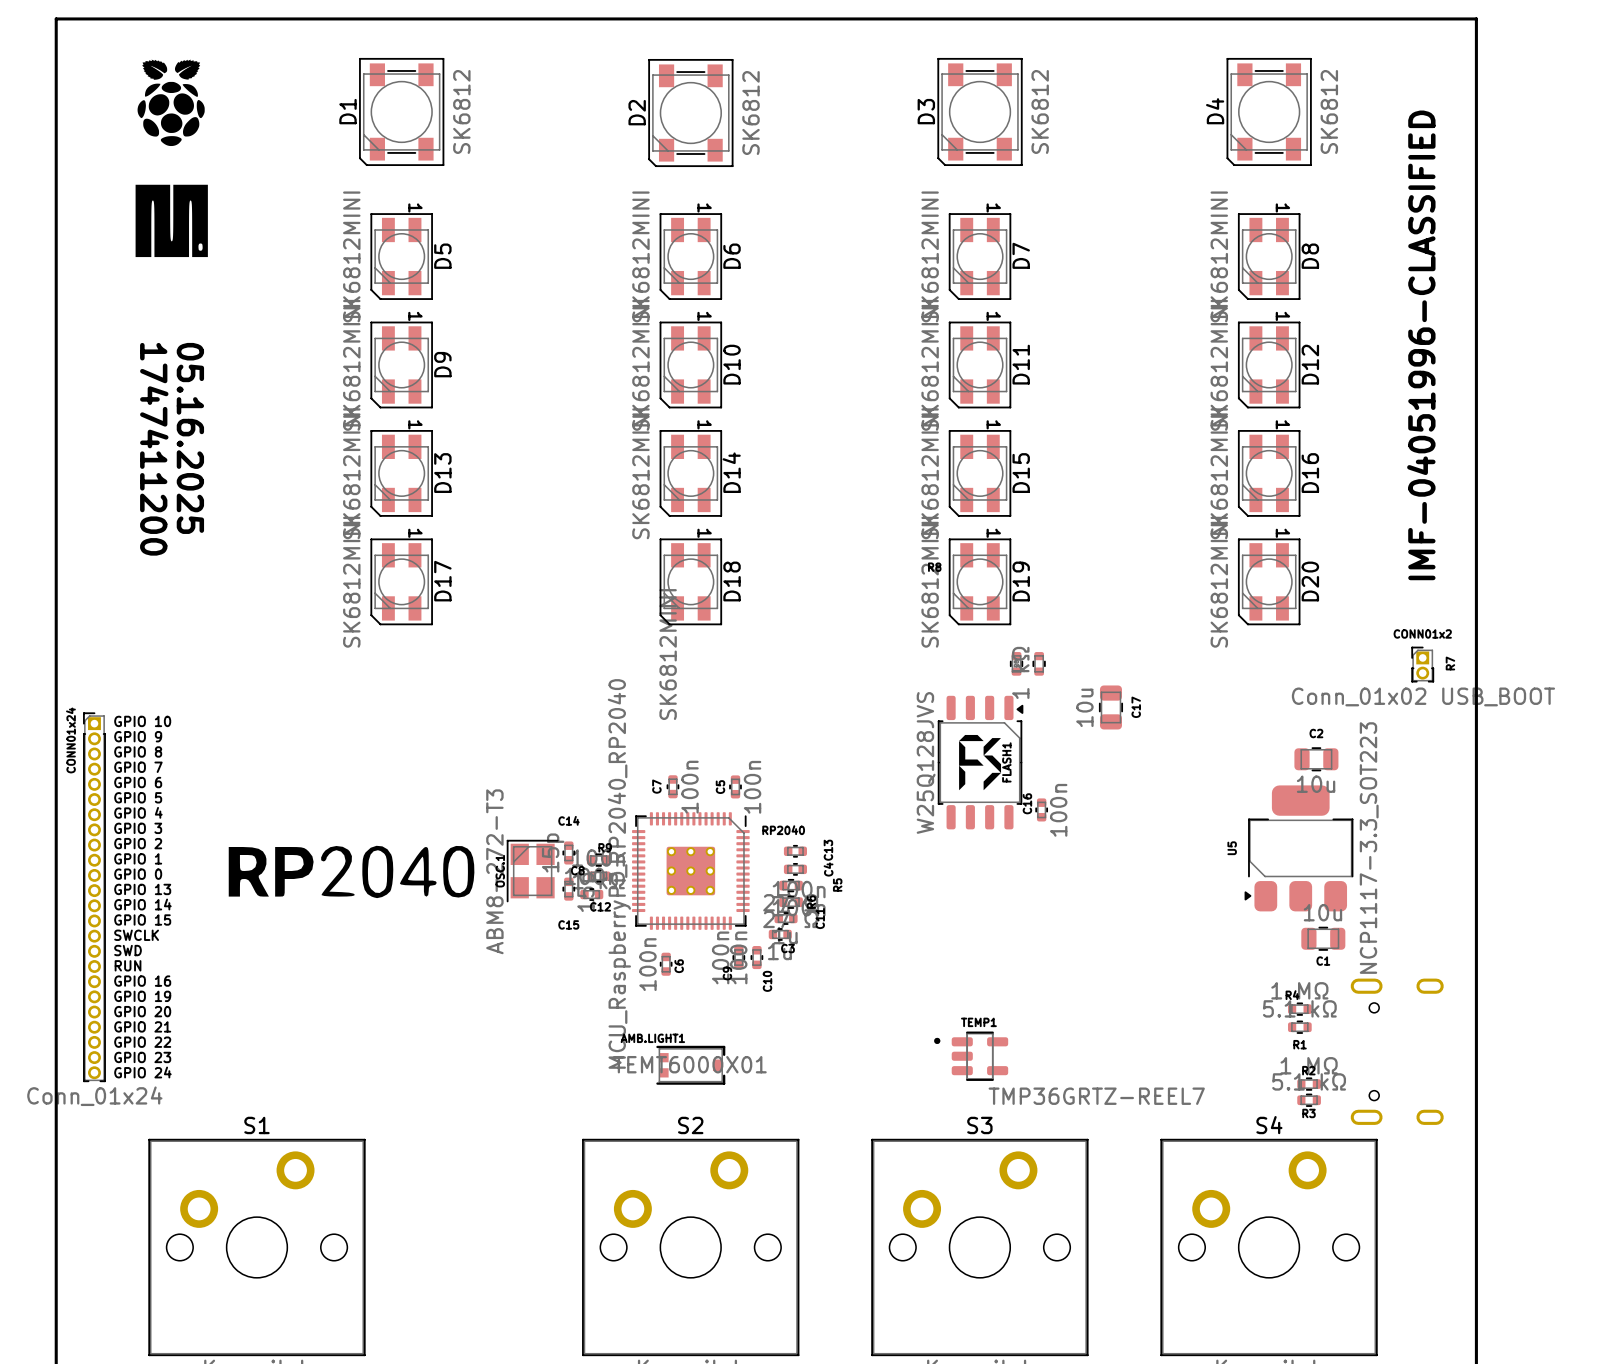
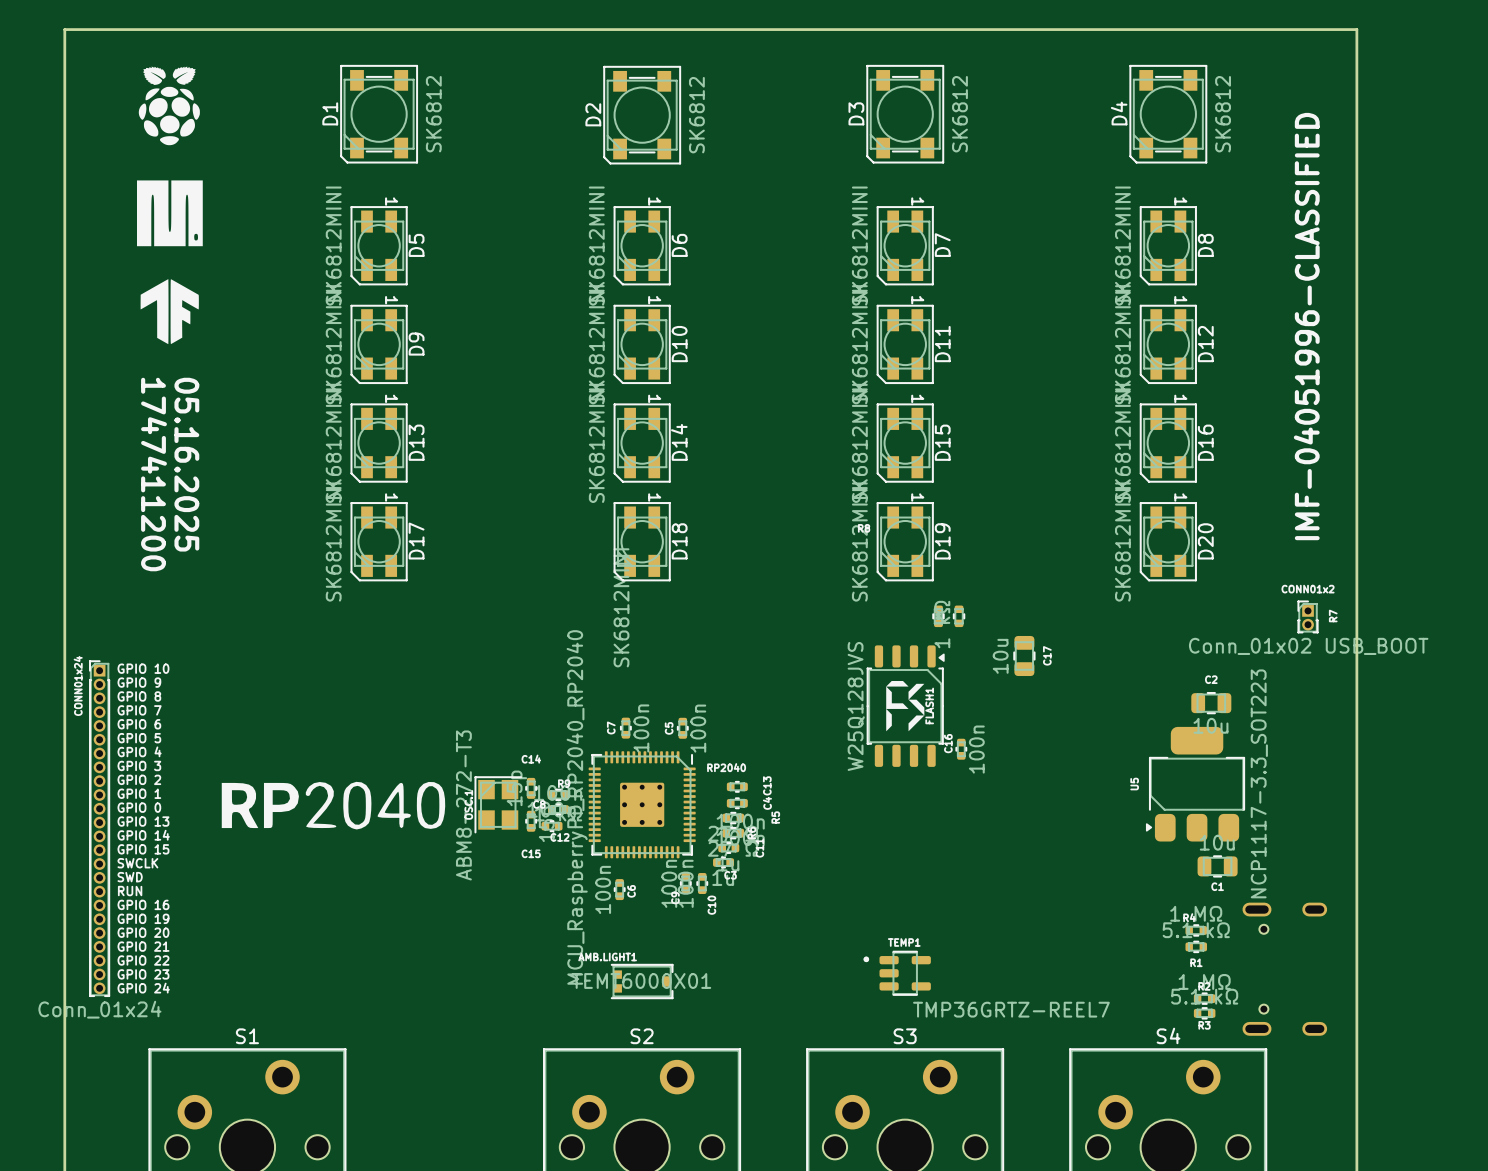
drawing: none -> [140, 279, 199, 345]
text position: 05.16.2025 (190, 438) -> 05.16.2025 (186, 464)
text position: 1747411200 (154, 449) -> 1747411200 (154, 474)

